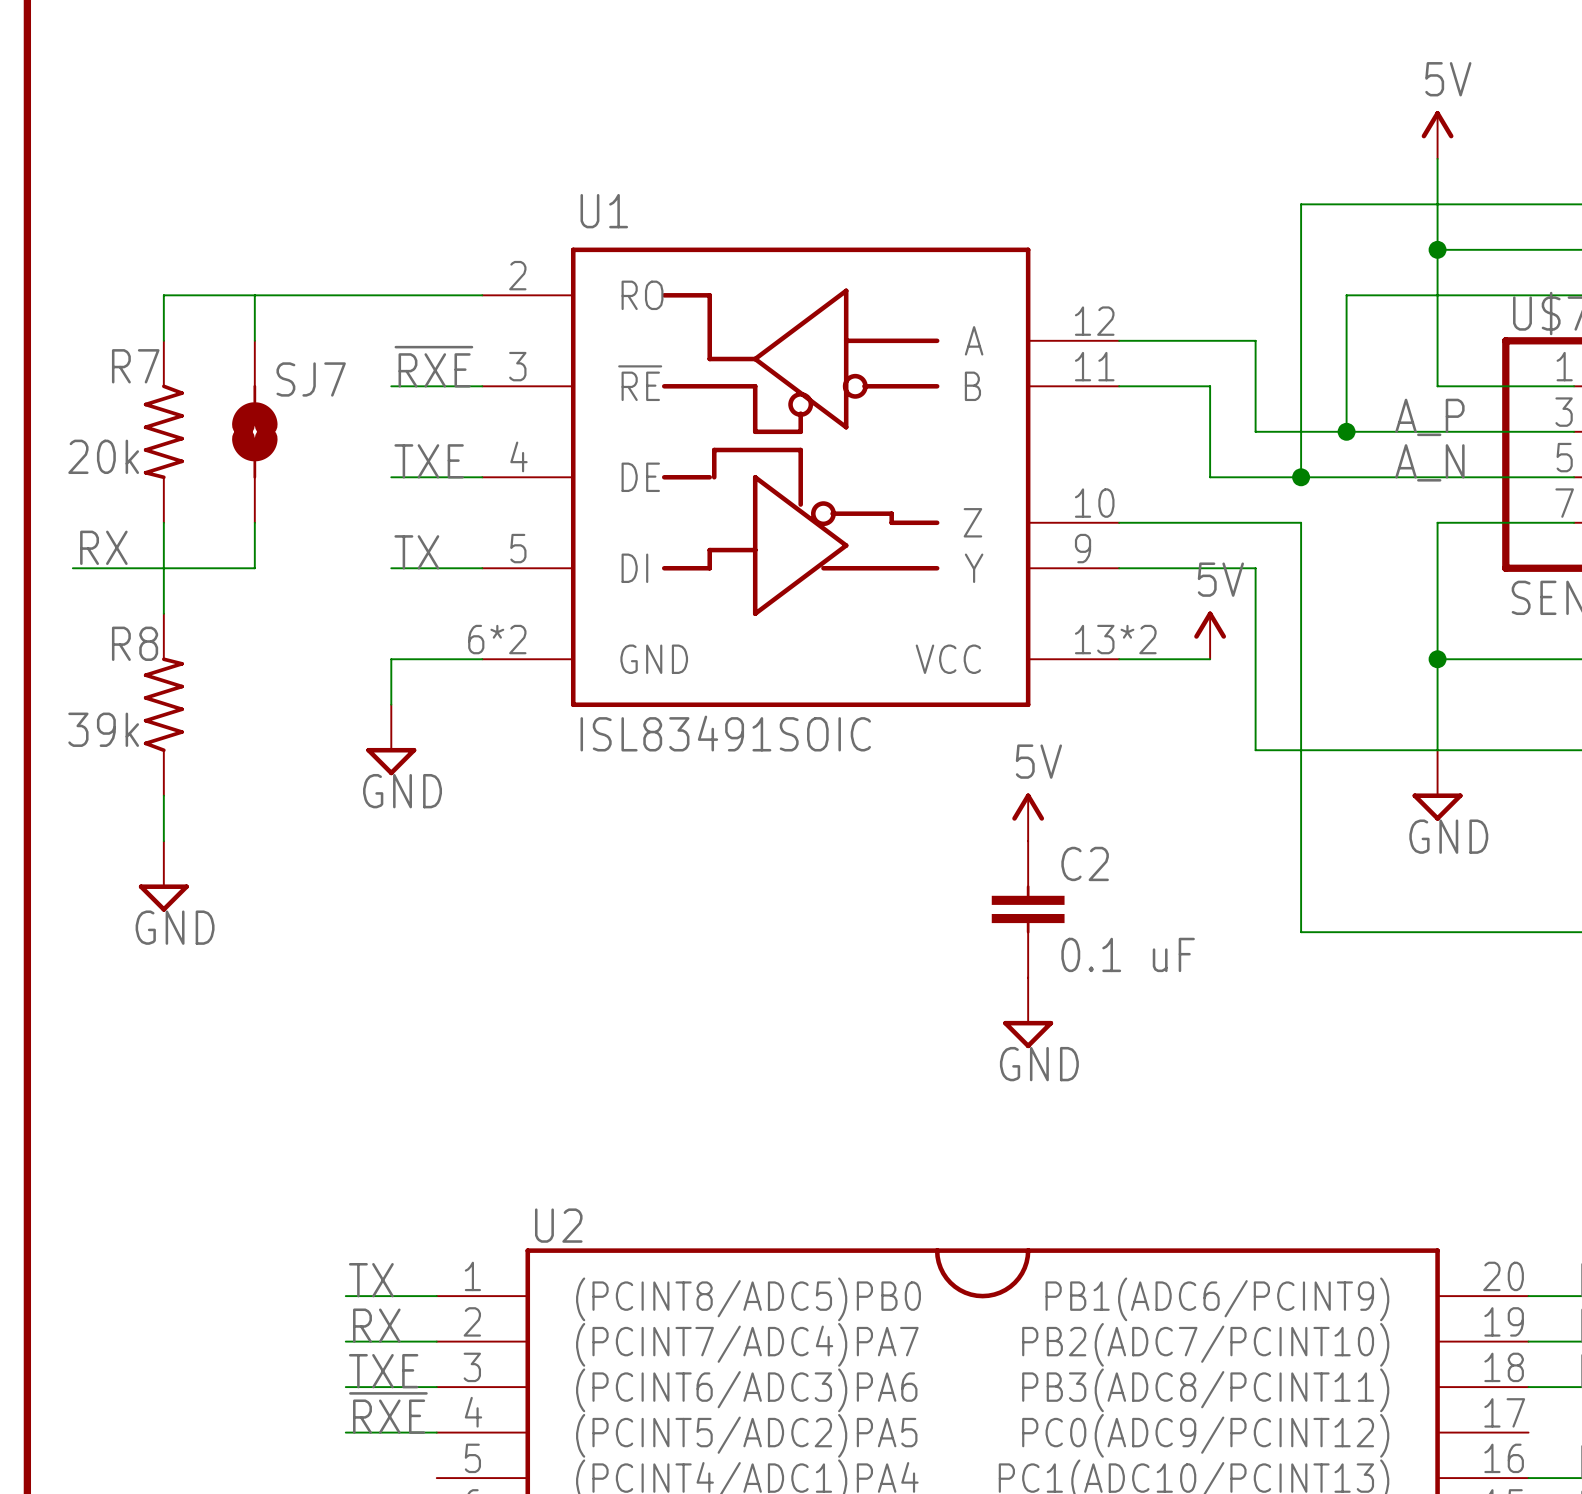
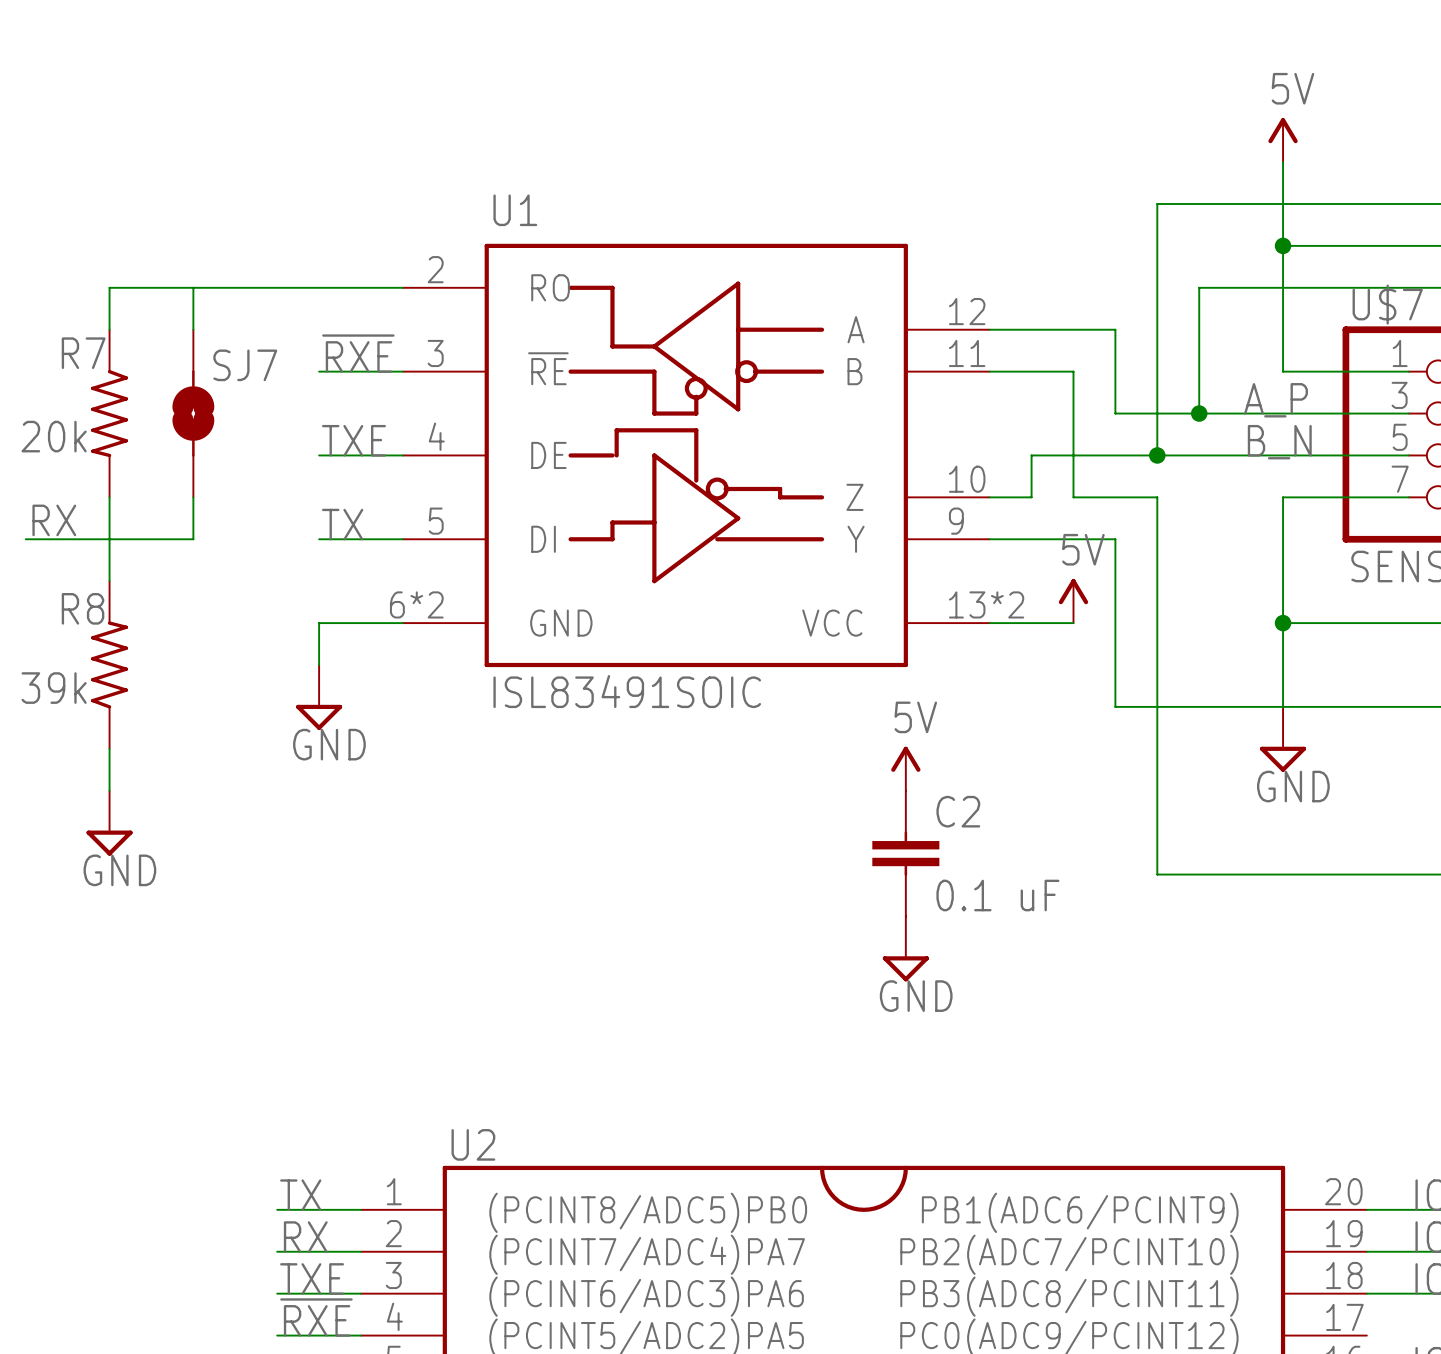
label: A_N (1429, 462) -> B_N (1279, 442)
wire: (1164, 522) (1210, 522) -> (1031, 497) (1031, 455) (1073, 455) (1073, 497)

